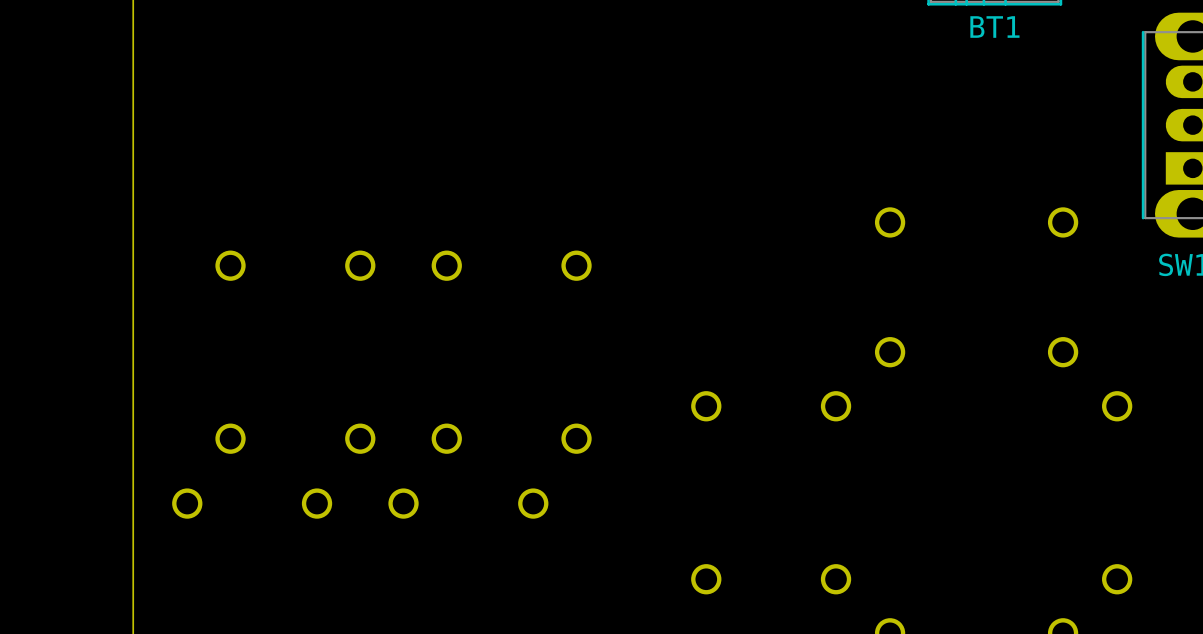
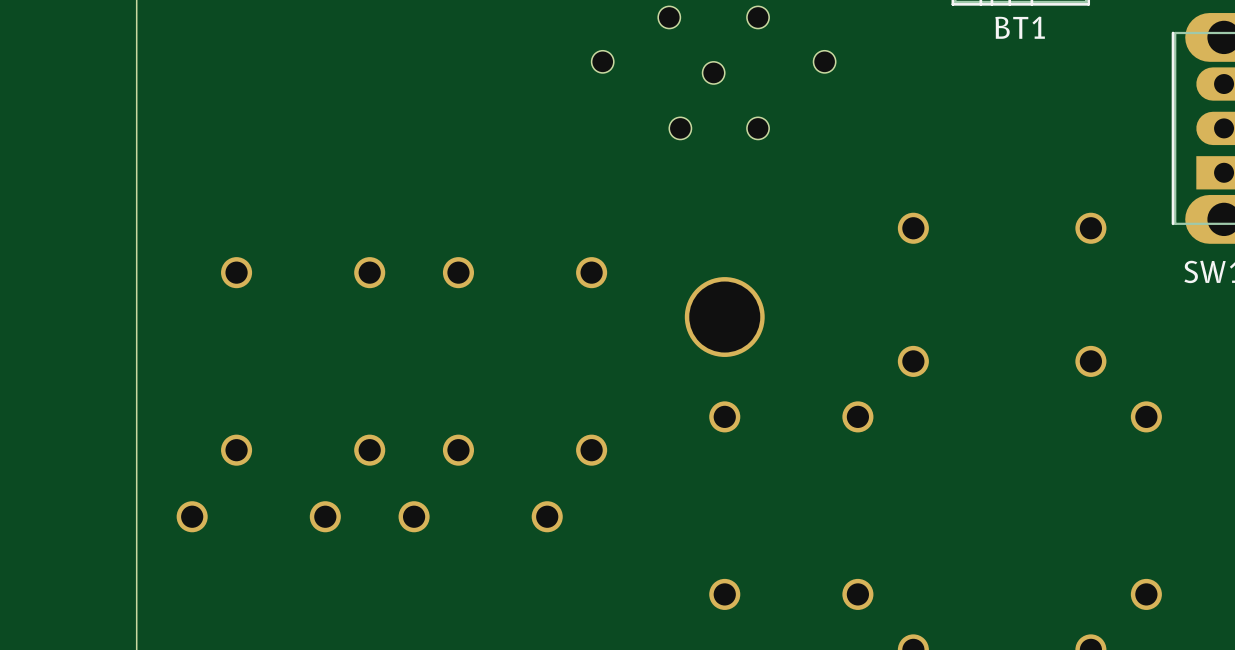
part: none -> (669, 17)
part: none -> (758, 17)
part: none -> (602, 61)
part: none -> (824, 61)
part: none -> (713, 72)
part: none -> (680, 128)
part: none -> (758, 128)
part: none -> (724, 317)

